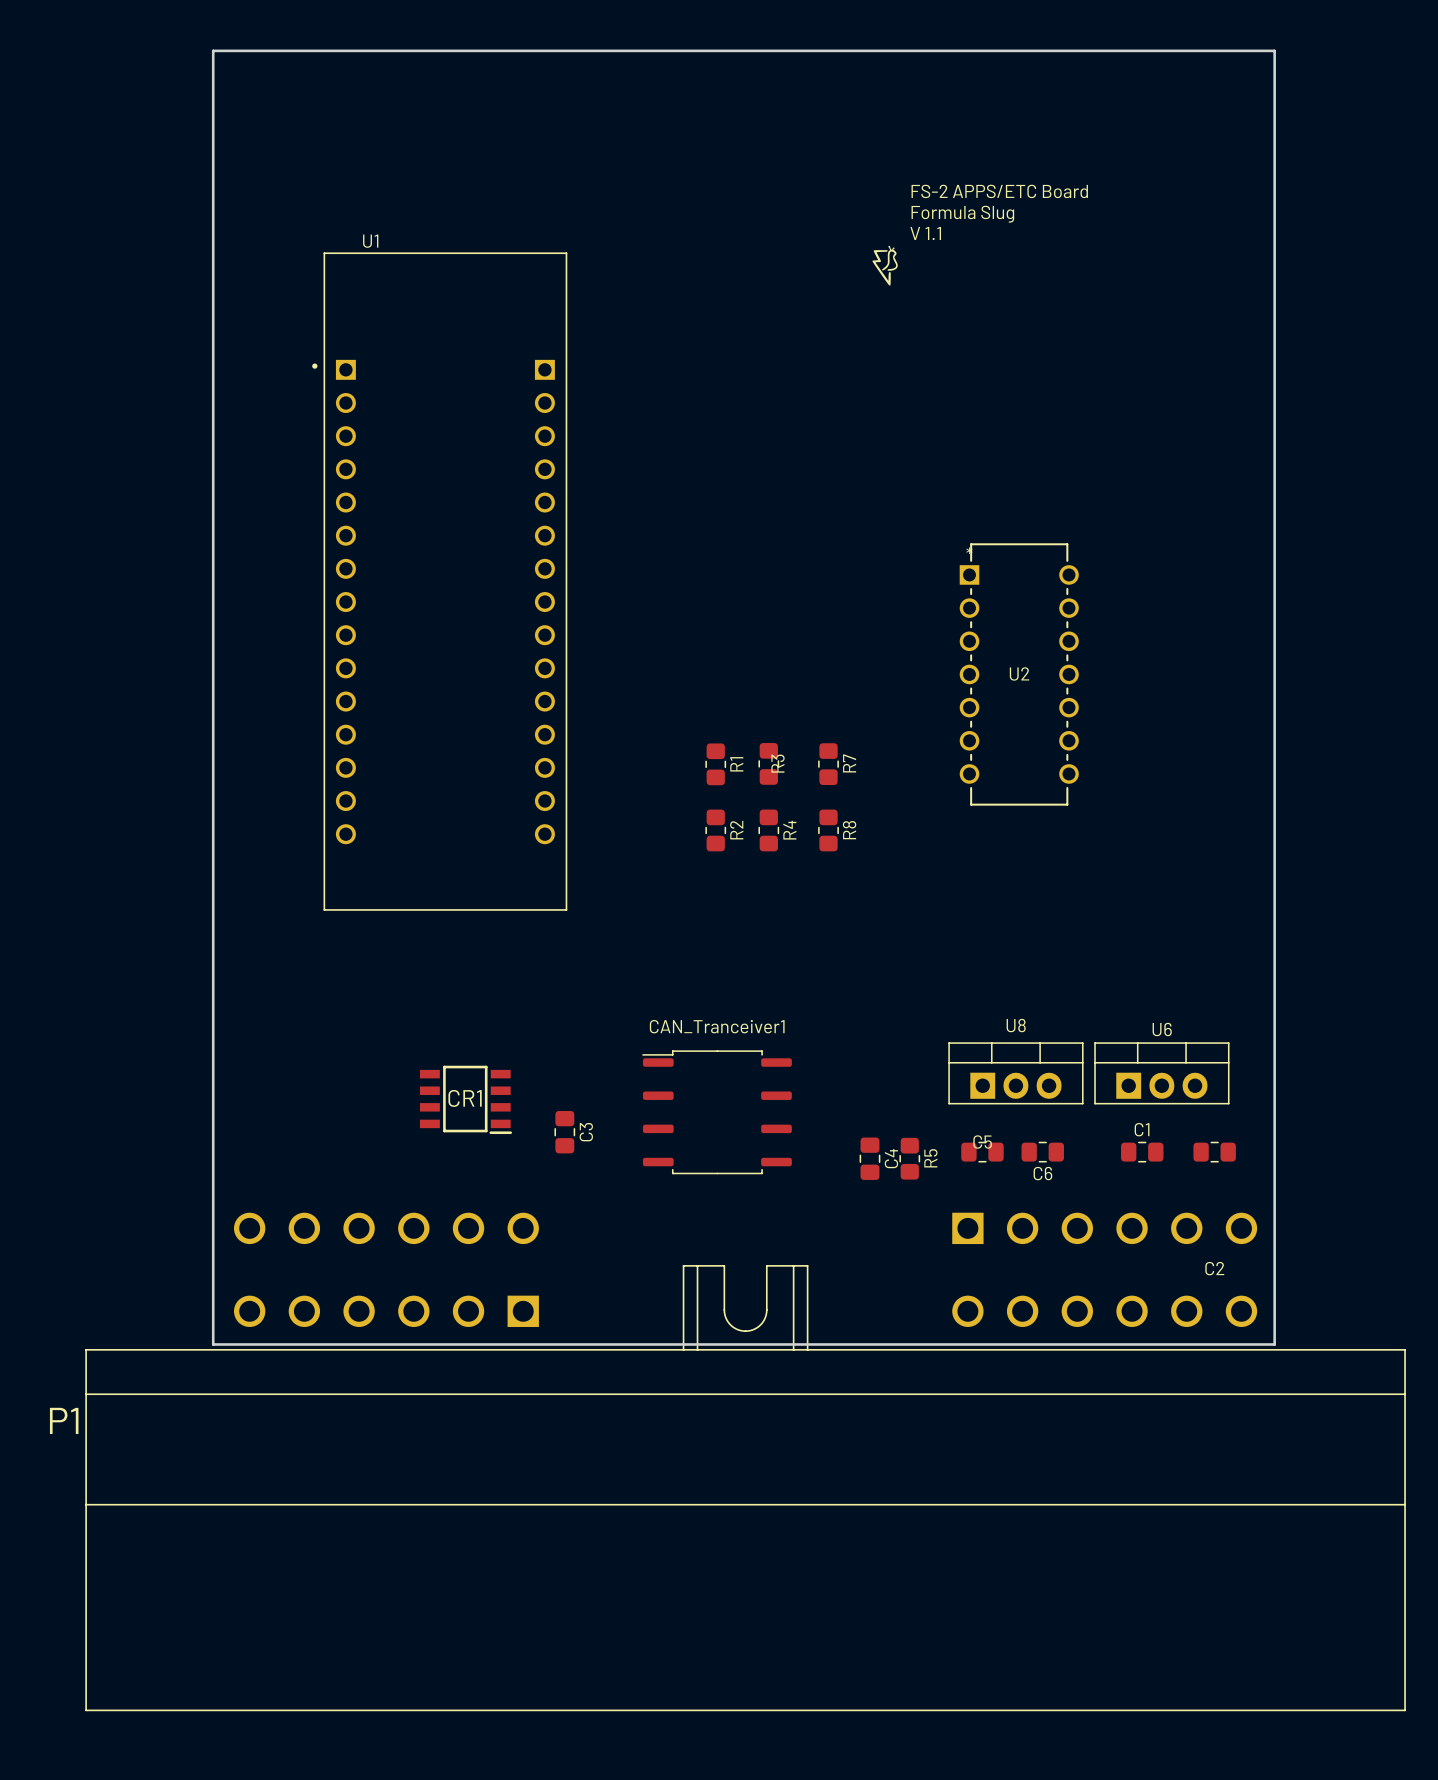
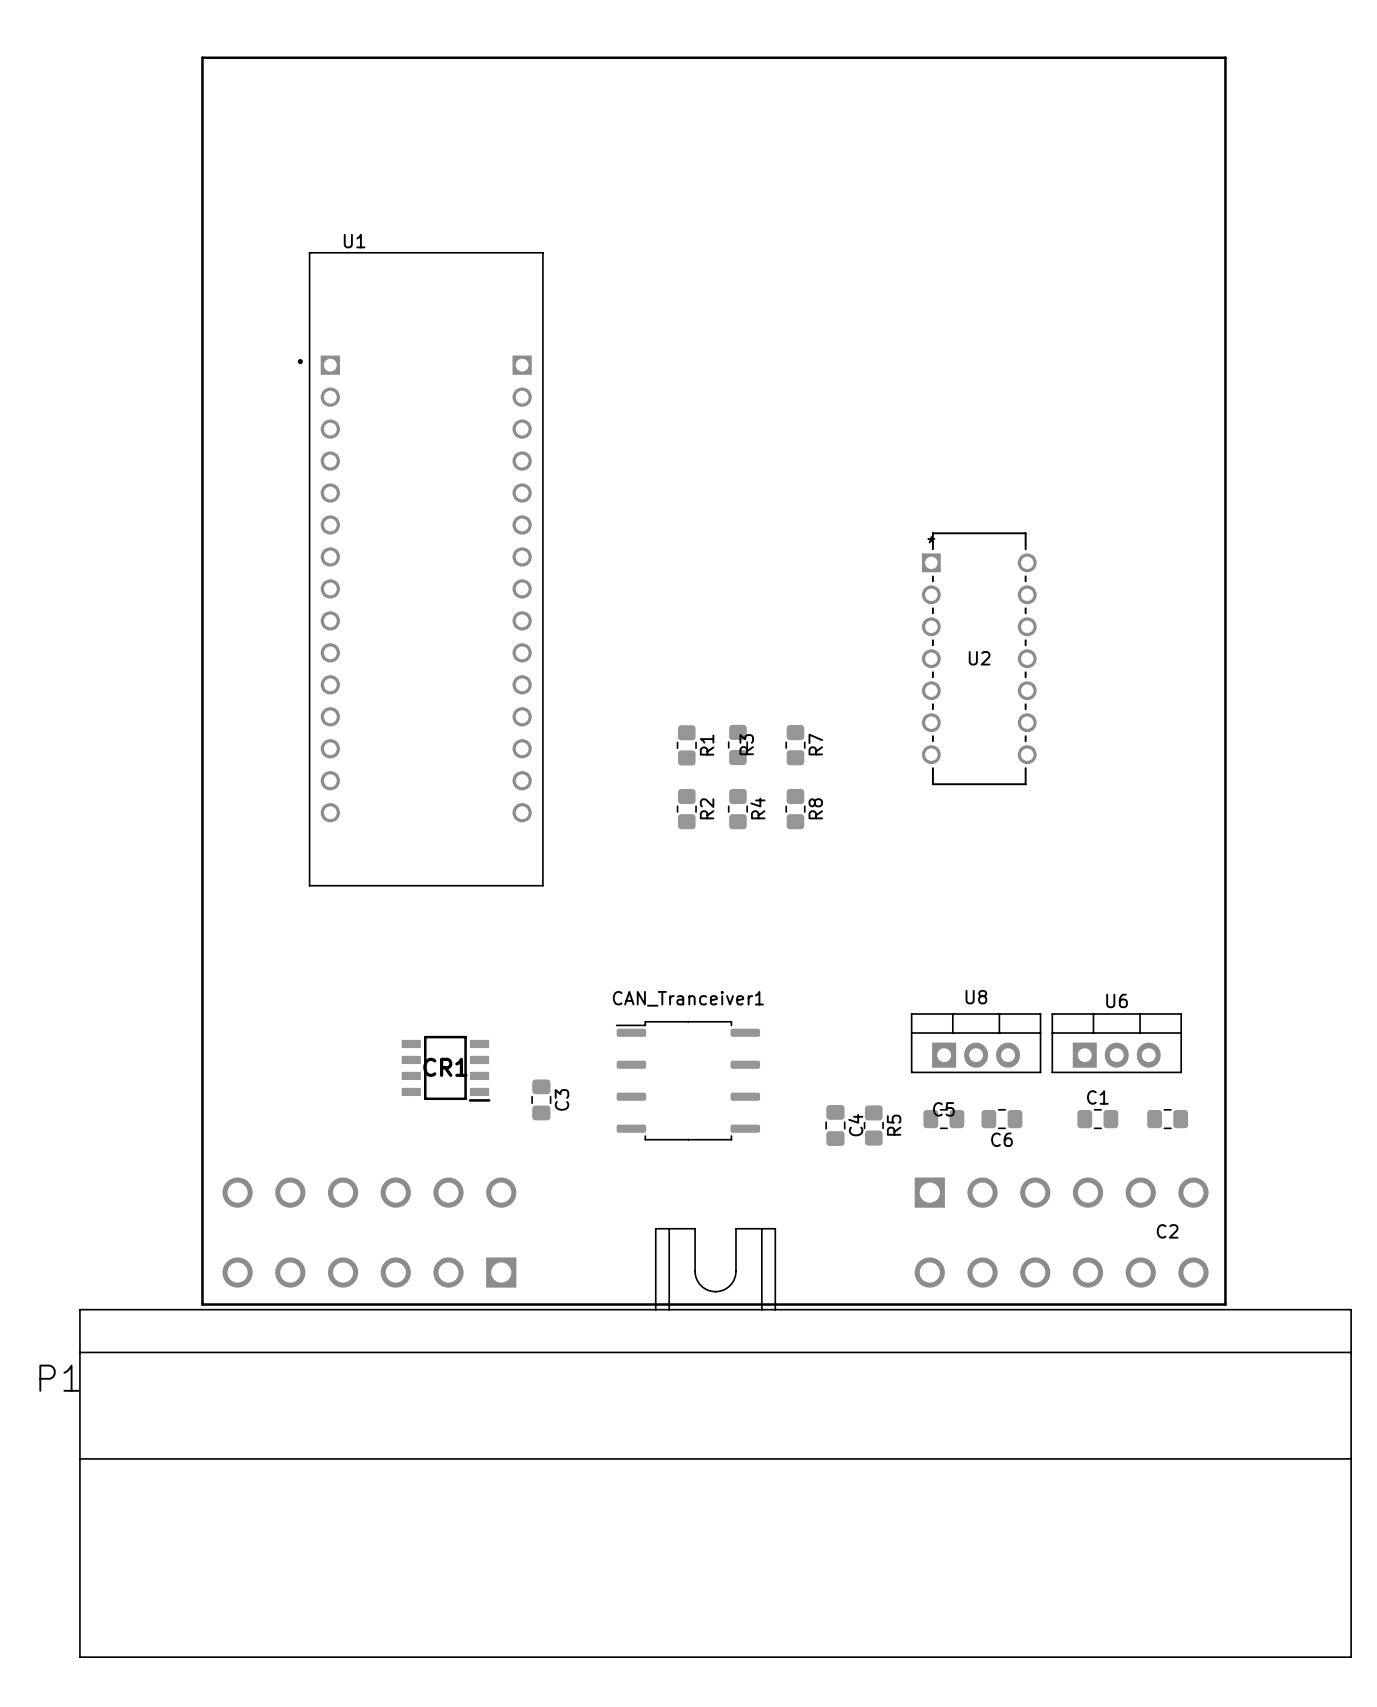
text: FS-2 APPS/ETC Board (999, 191) -> none
text: Formula Slug (962, 214) -> none
text: V 1.1 (925, 233) -> none
drawing: [872, 245, 898, 286] -> none

